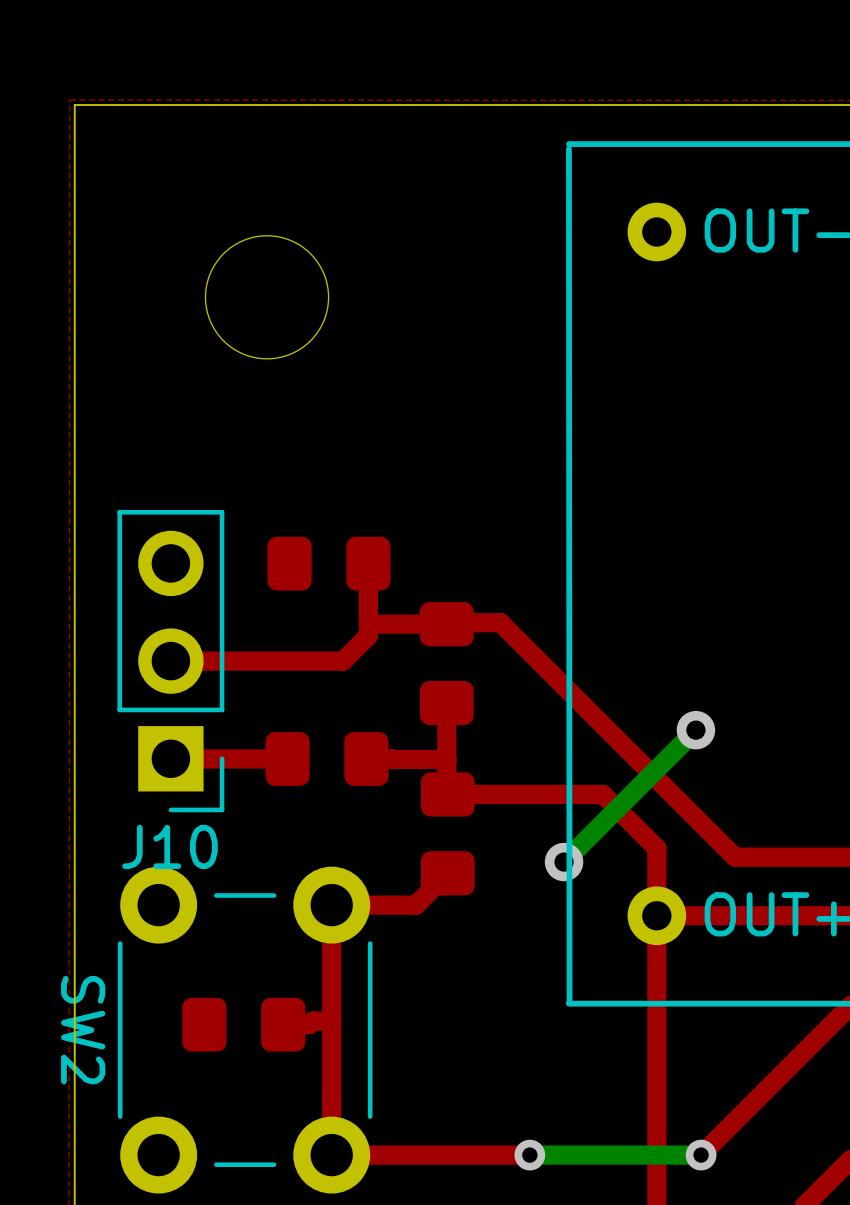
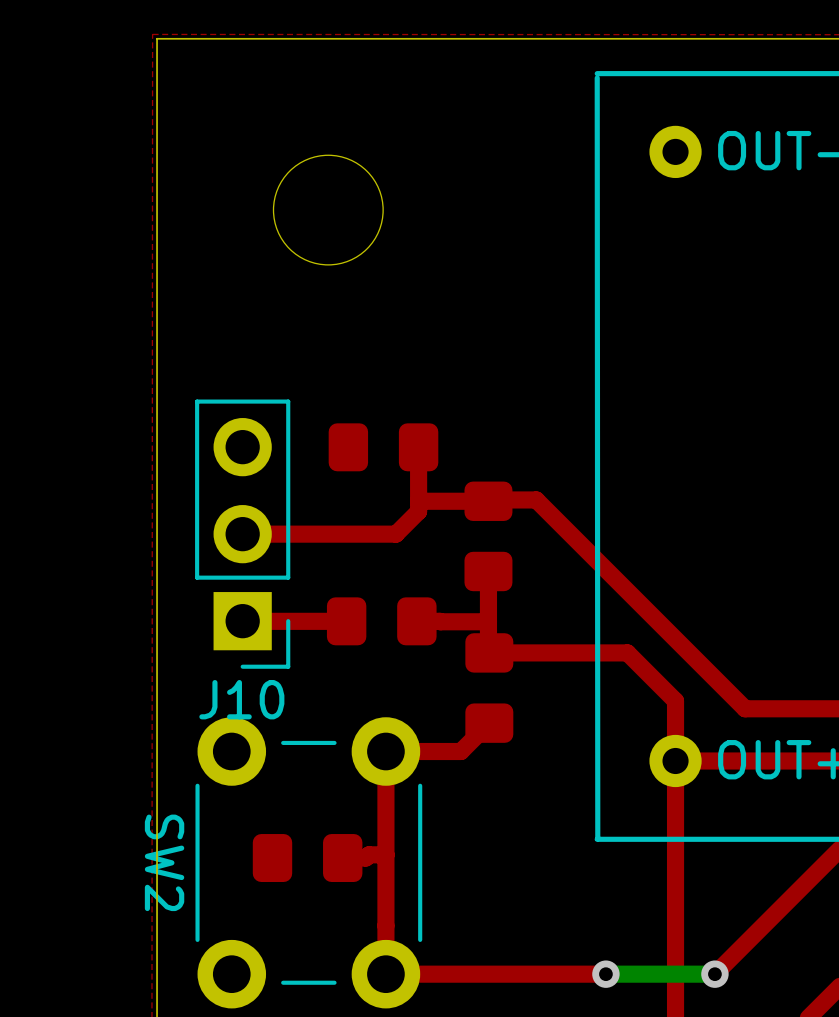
bottom track: (695, 730) (564, 862) -> none
via: (695, 730) -> none
via: (564, 862) -> none
via position: (529, 1155) -> (605, 974)
bottom track: (578, 1155) (529, 1155) -> none
top track: none -> (605, 974) (562, 974)

